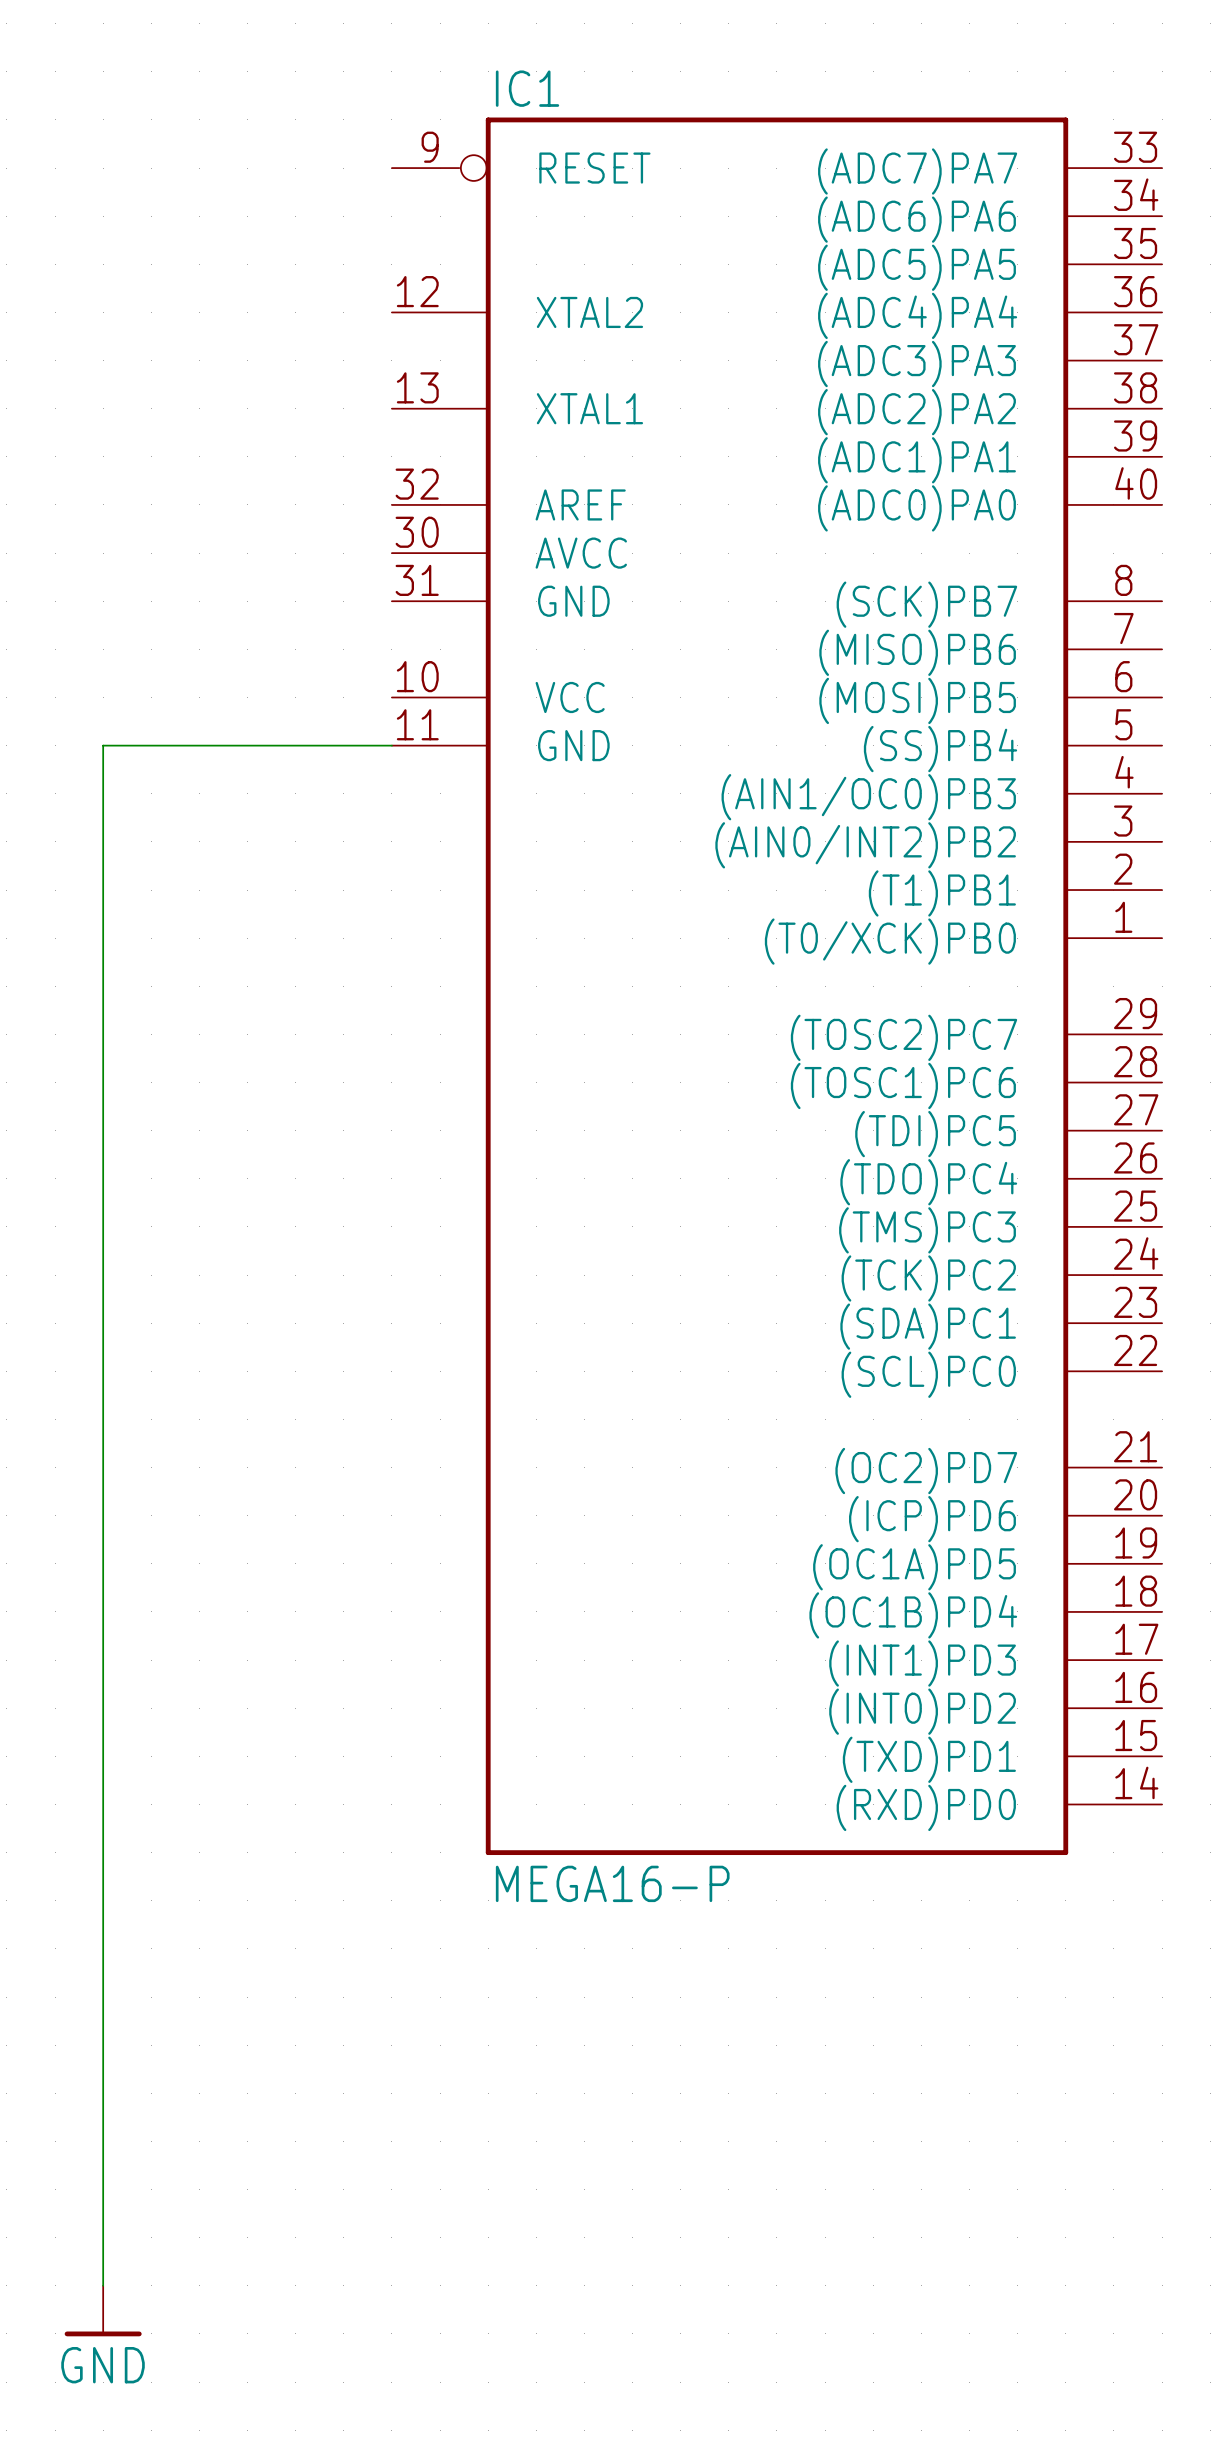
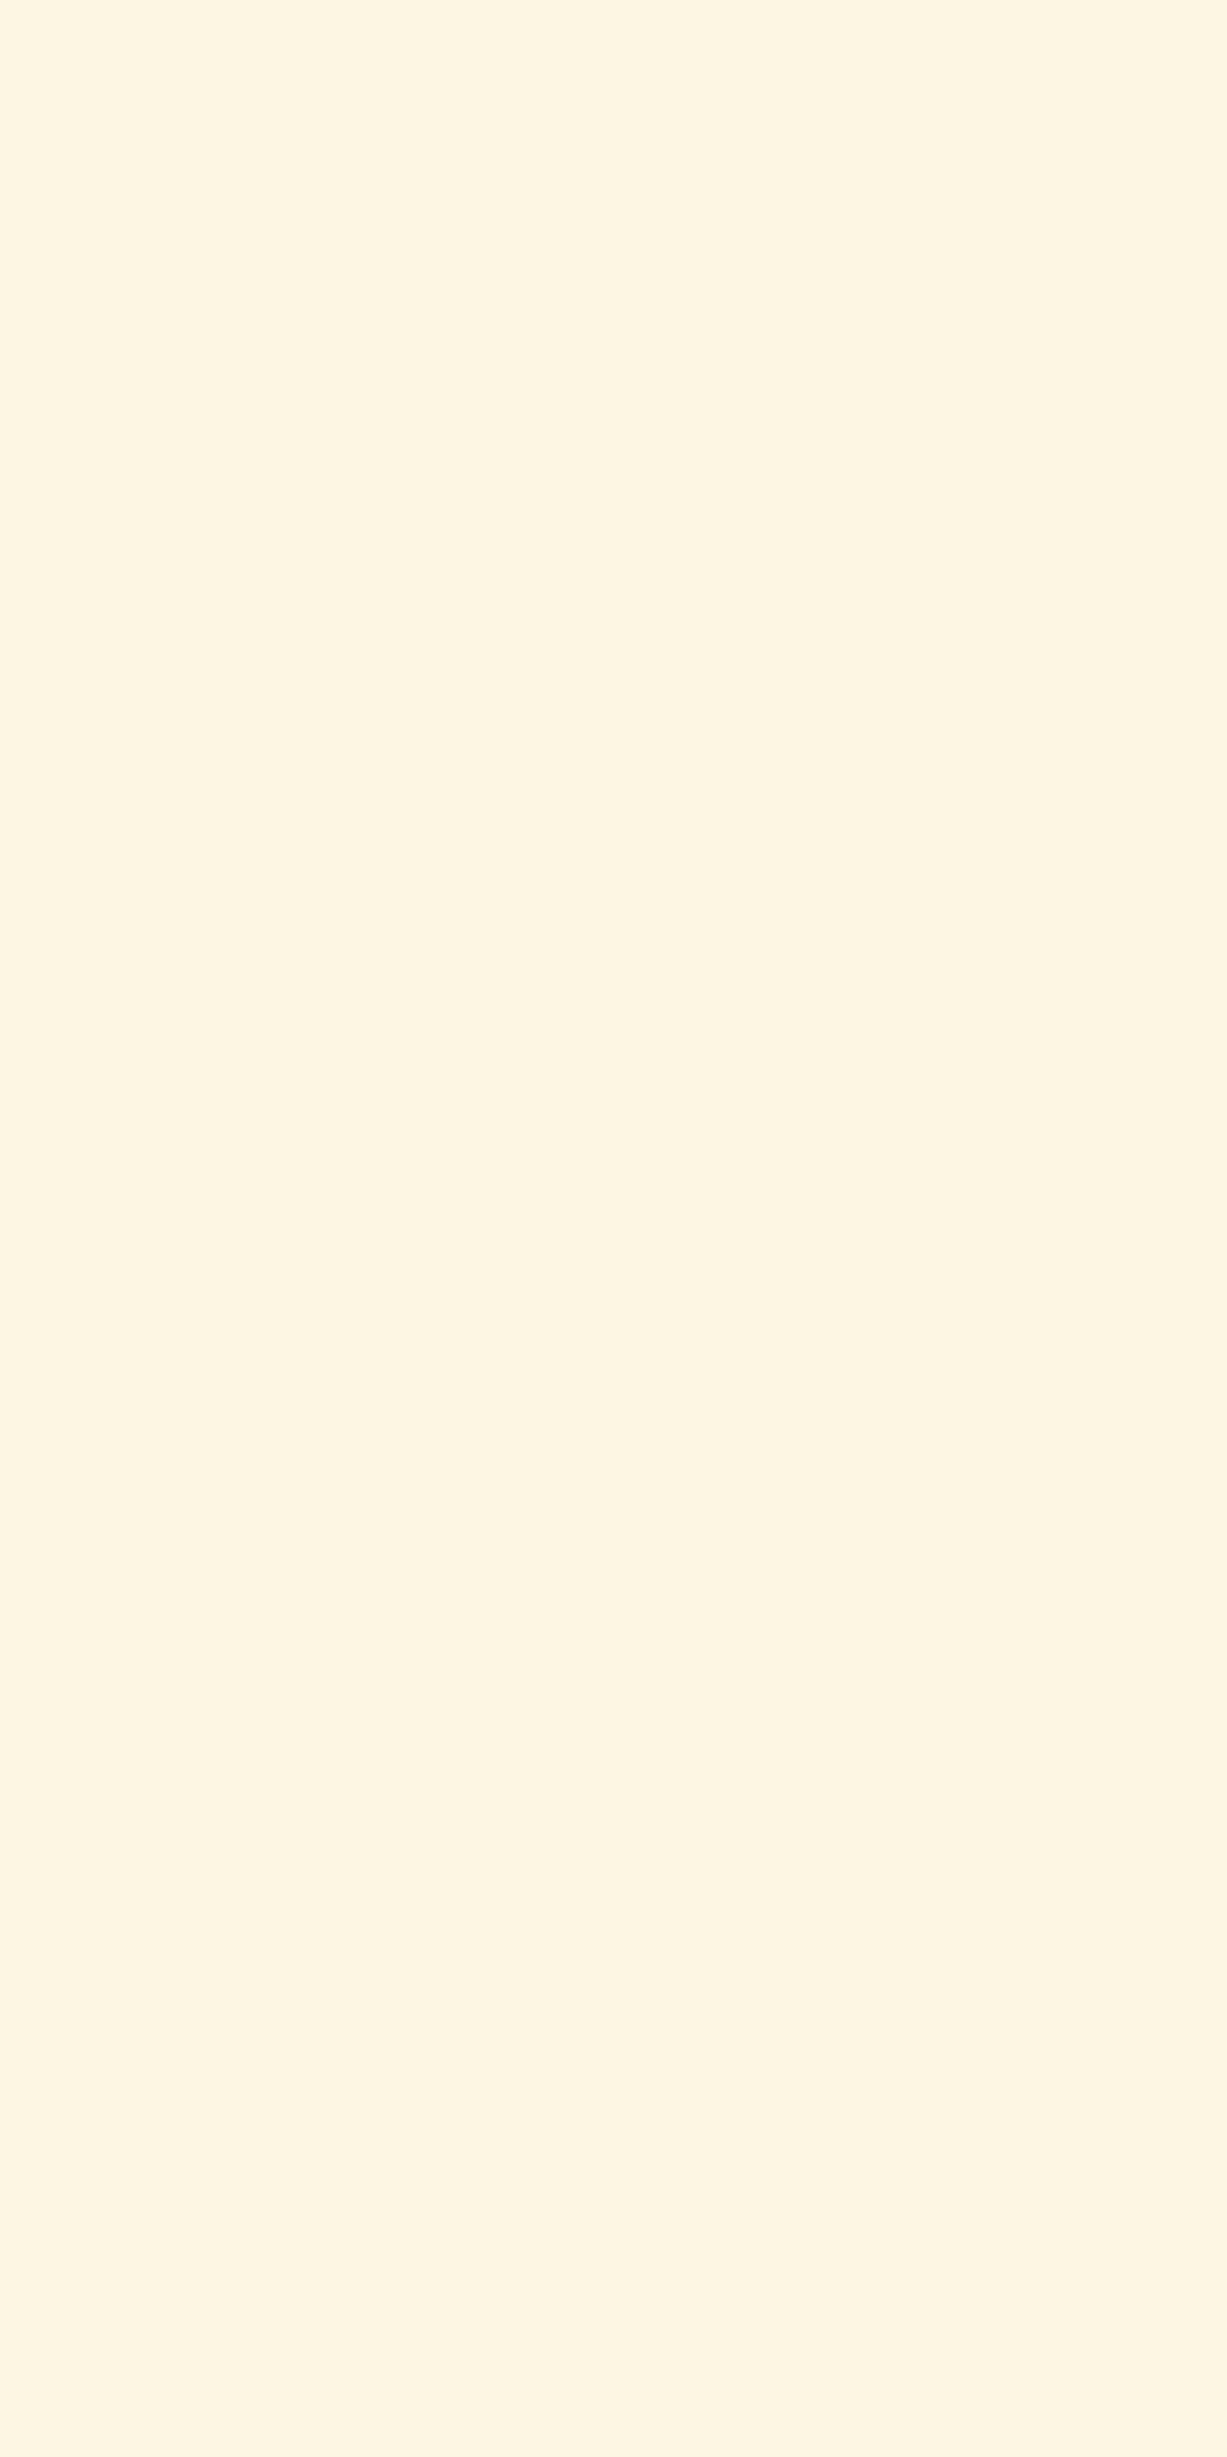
wire: (391, 745) (103, 745) (103, 2285) -> none
IC1: MEGA16-P (776, 986) -> none
power symbol: GND (103, 2311) -> none

